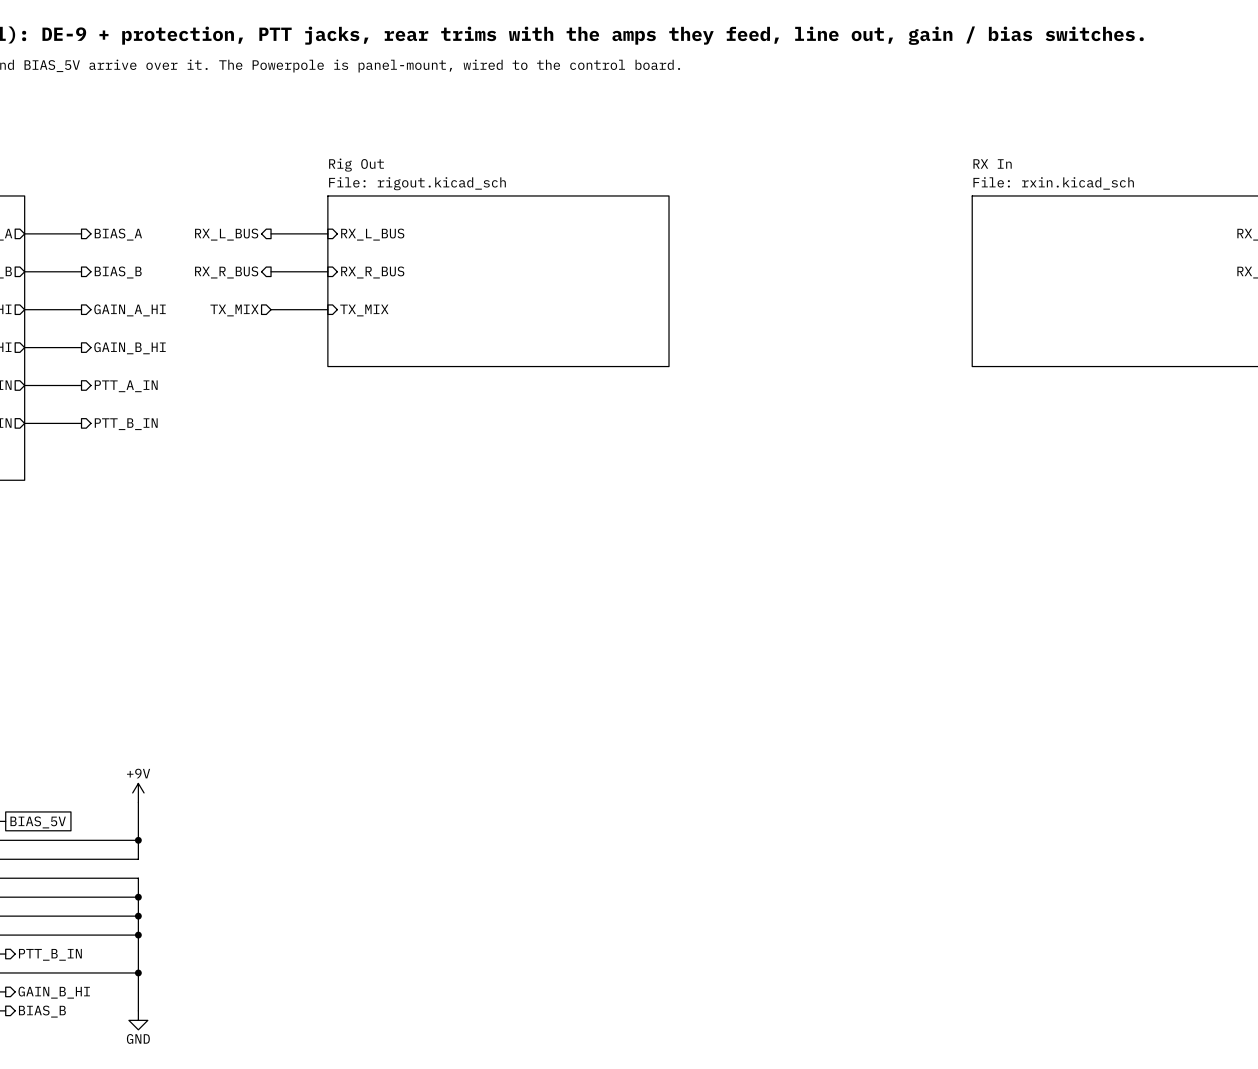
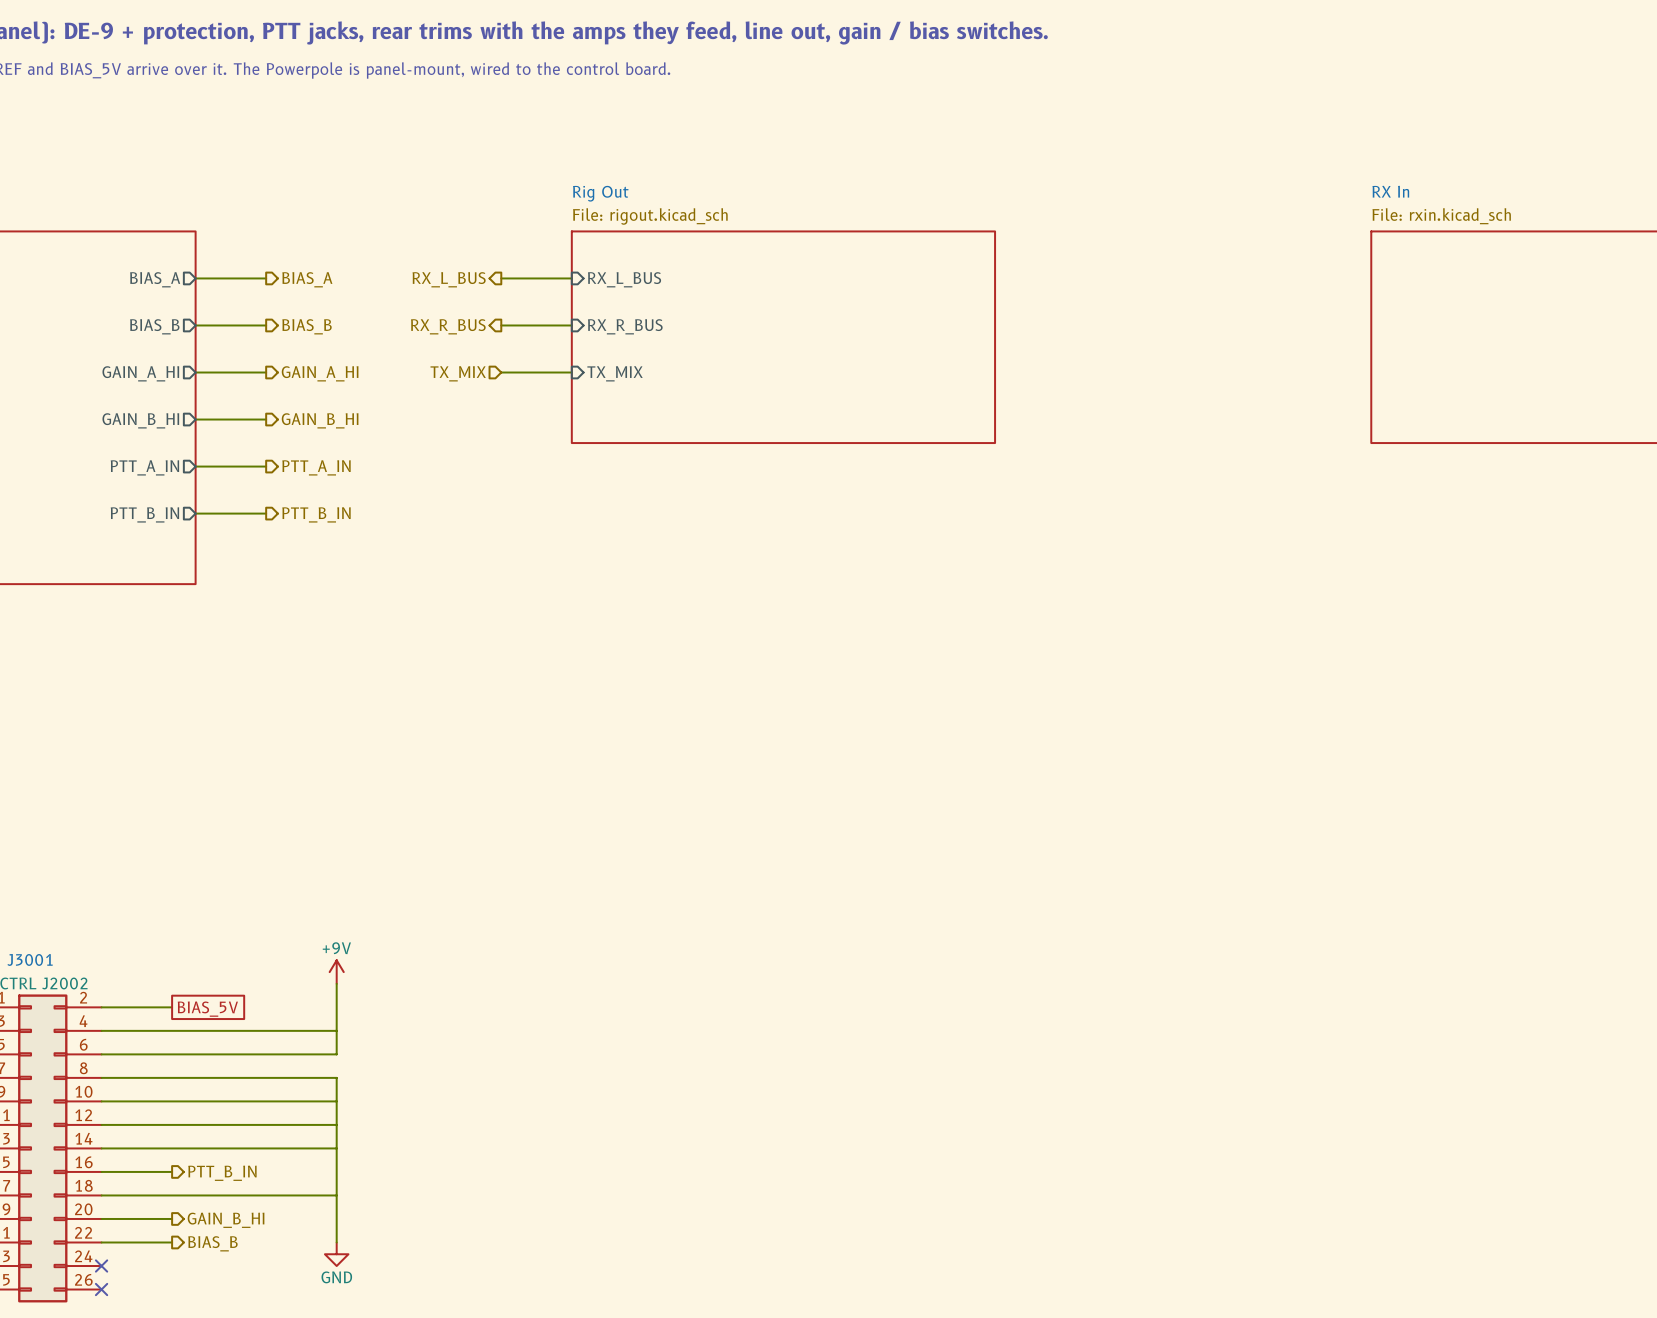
junction: (138, 840) -> none
junction: (138, 897) -> none
junction: (138, 916) -> none
junction: (138, 935) -> none
junction: (138, 972) -> none

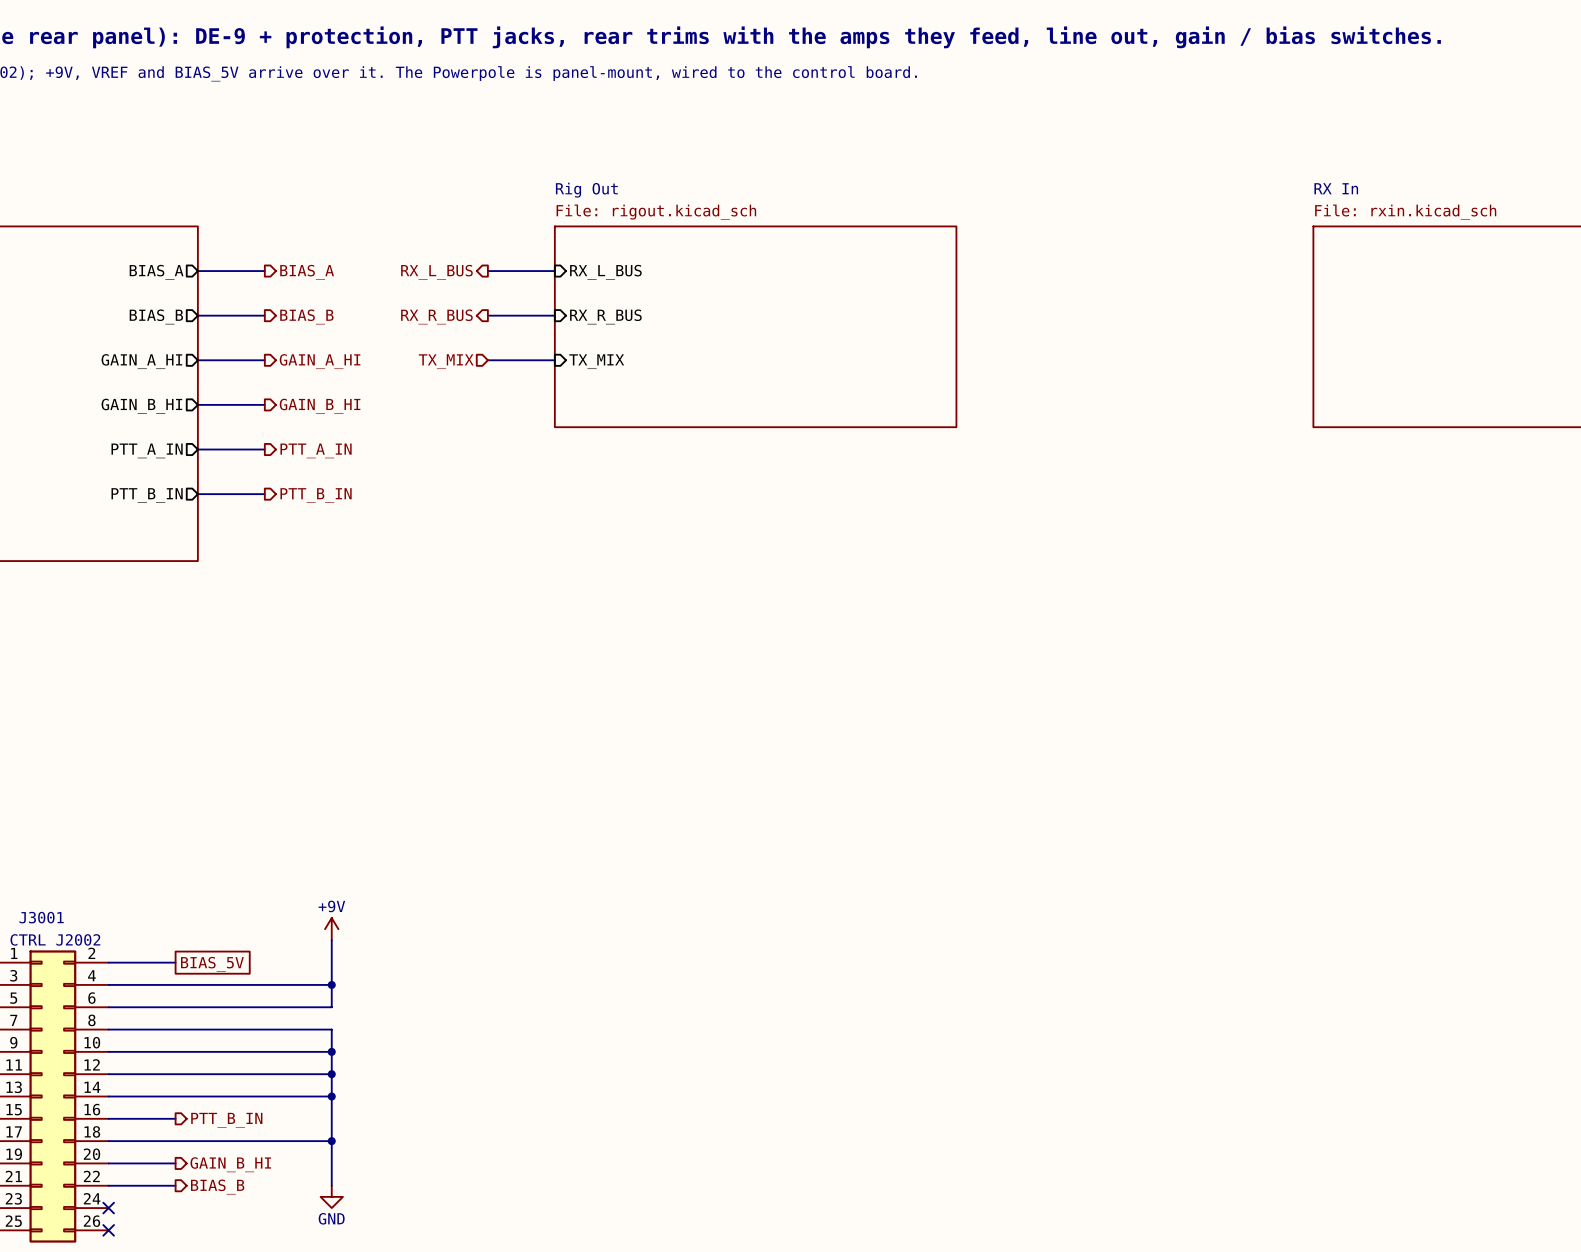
junction: none -> (331, 984)
junction: none -> (331, 1051)
junction: none -> (331, 1074)
junction: none -> (331, 1096)
junction: none -> (331, 1141)

